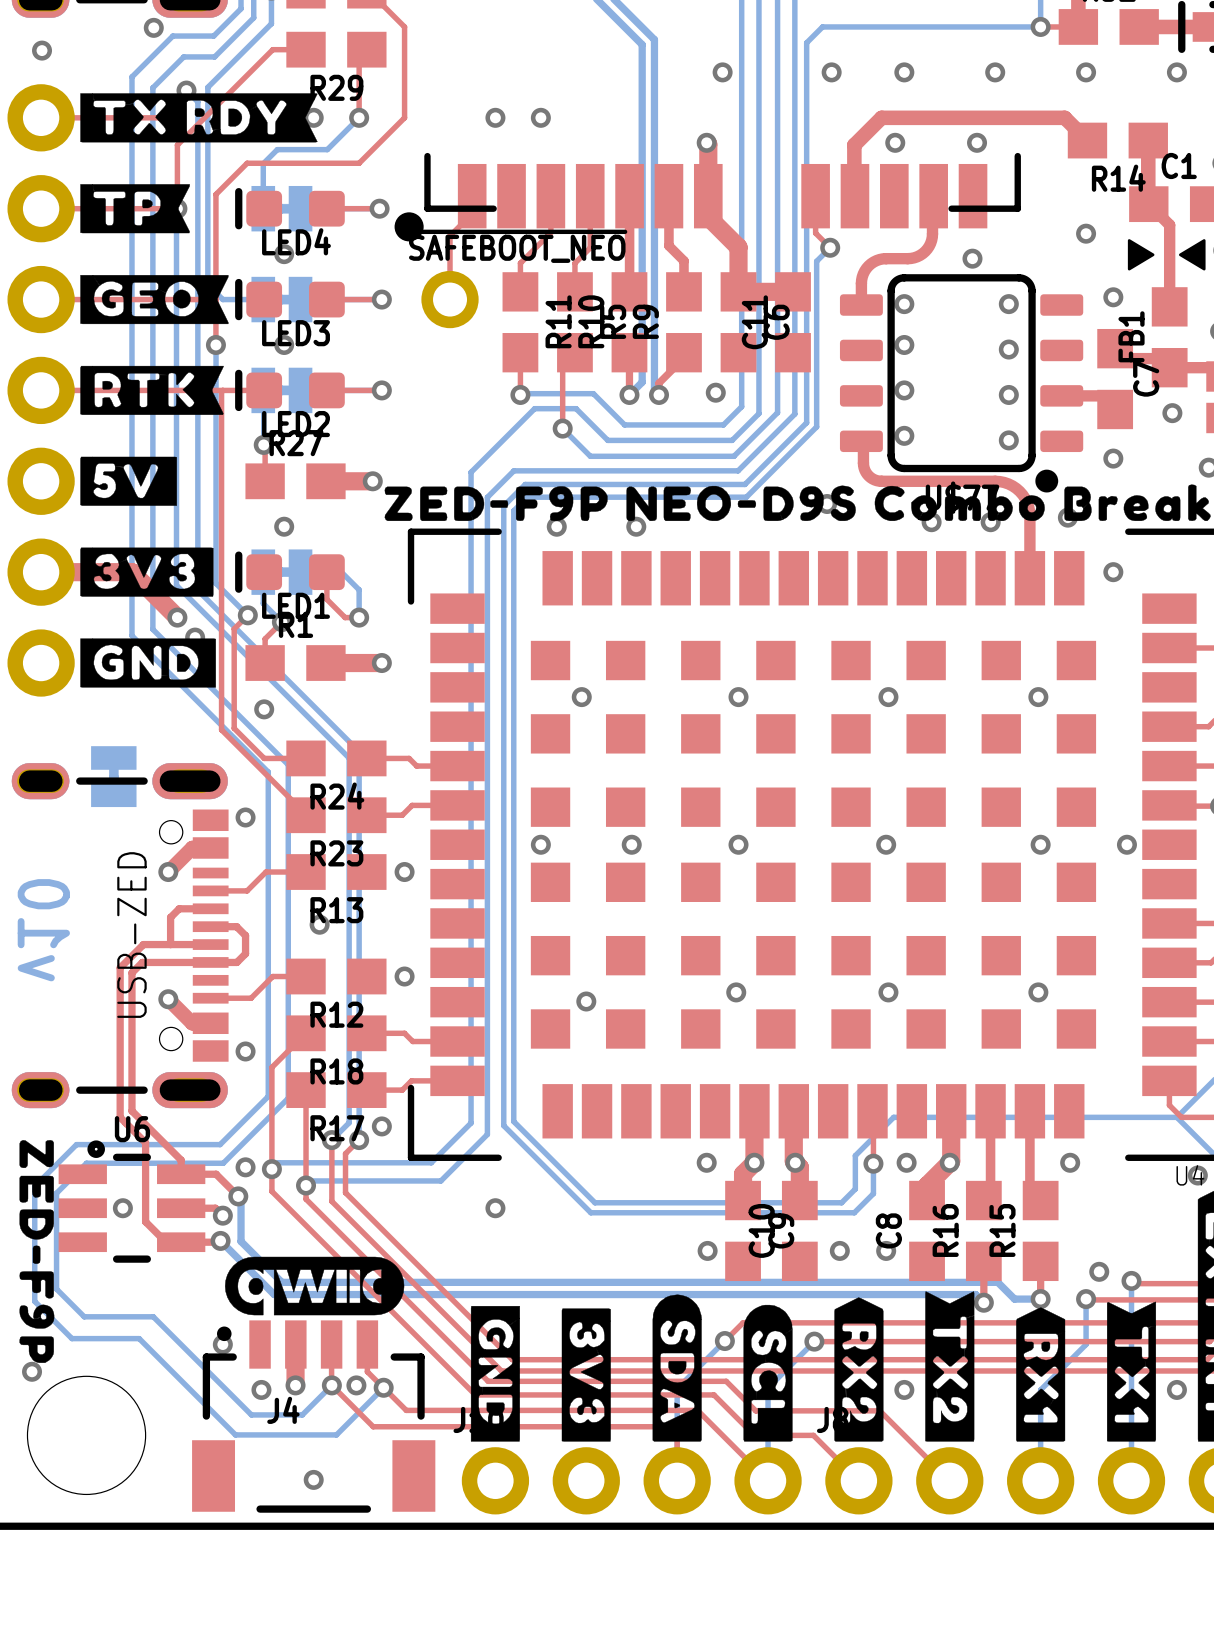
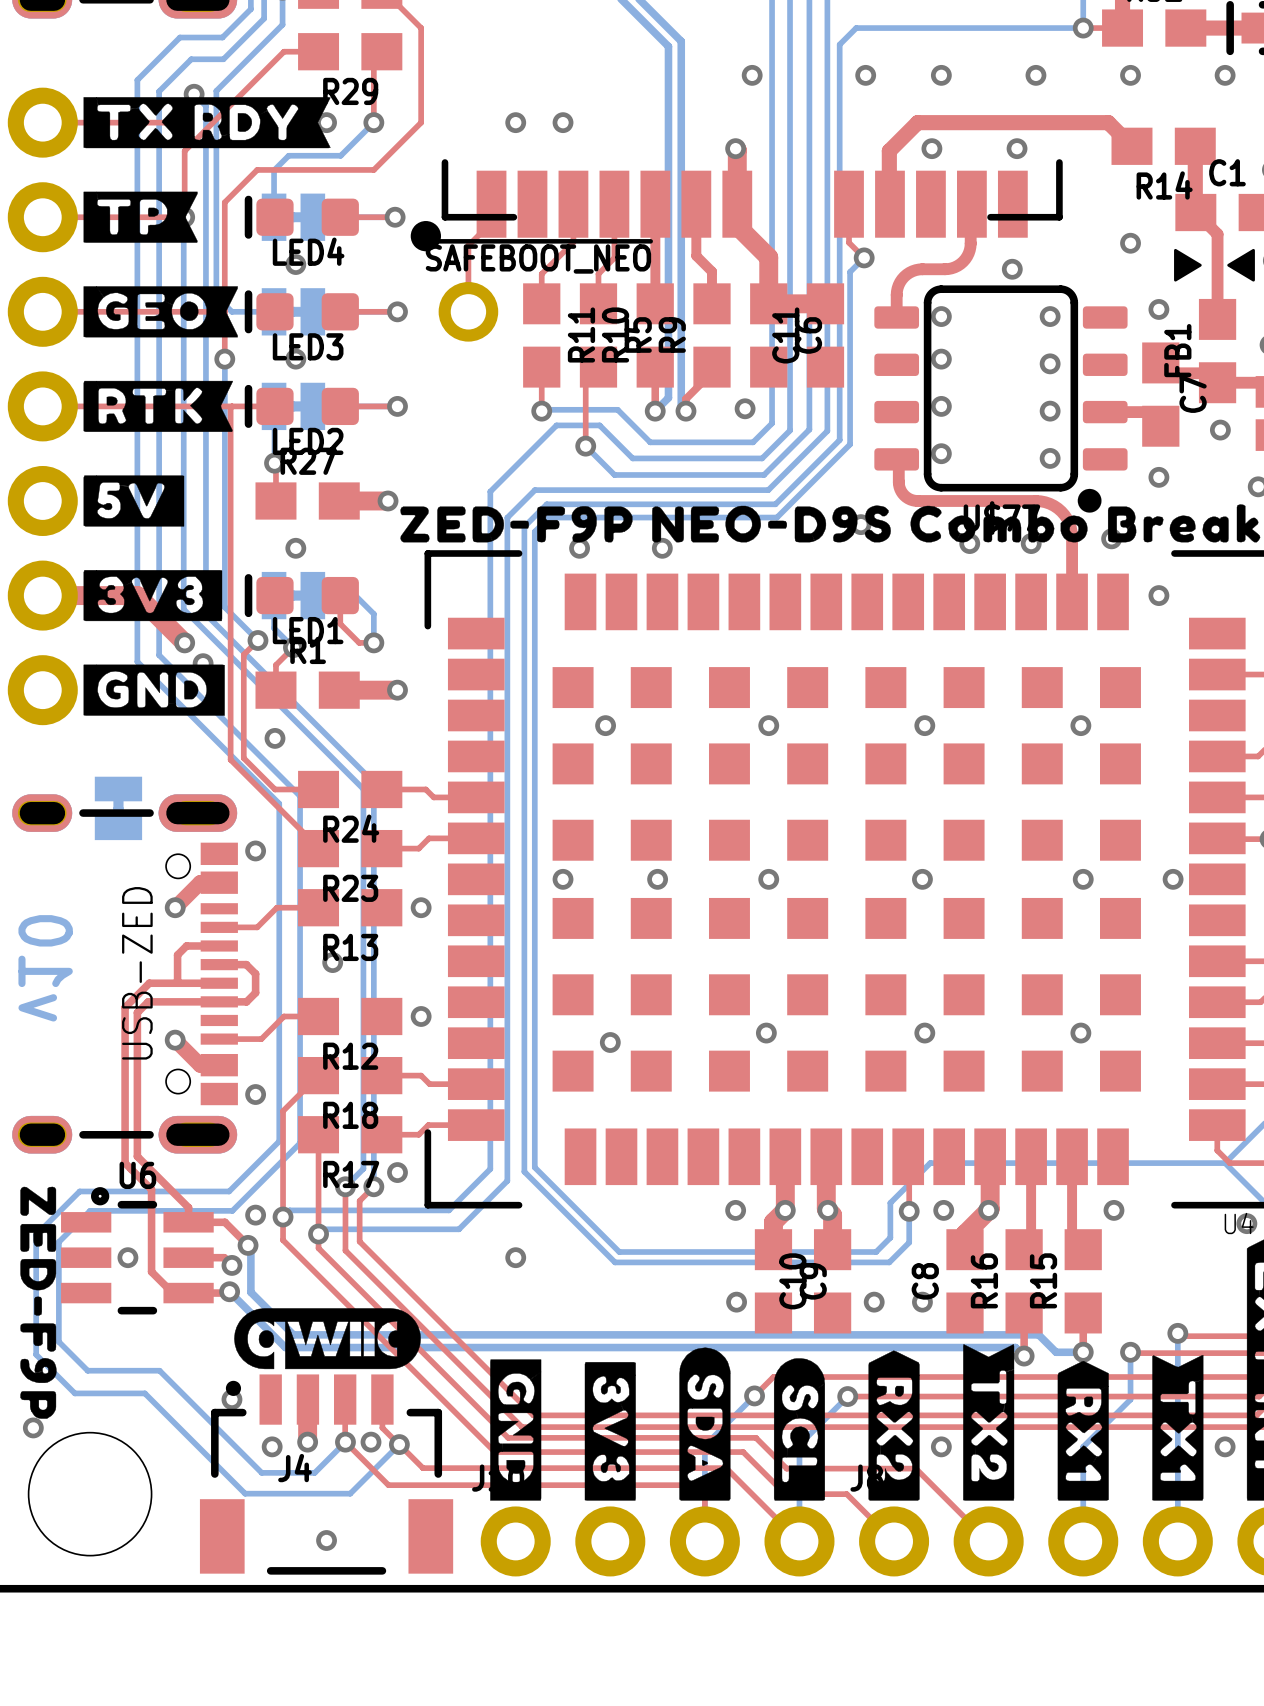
via: (153, 27) -> none
via: (42, 50) -> none
via: (1099, 1271) -> none

